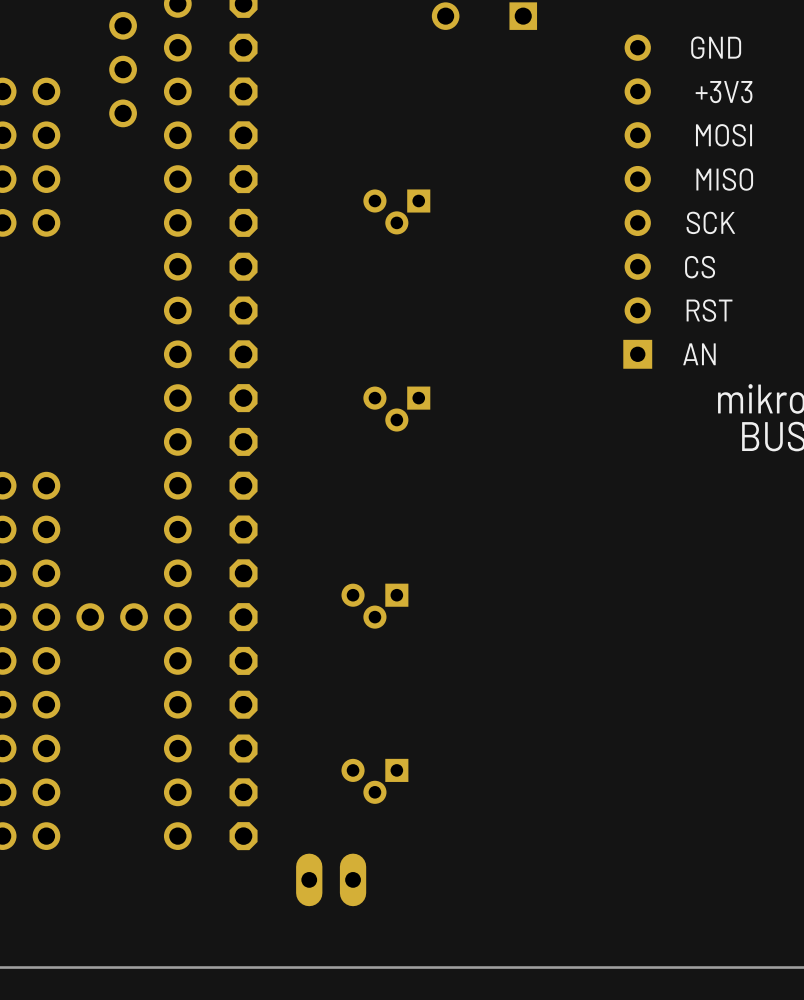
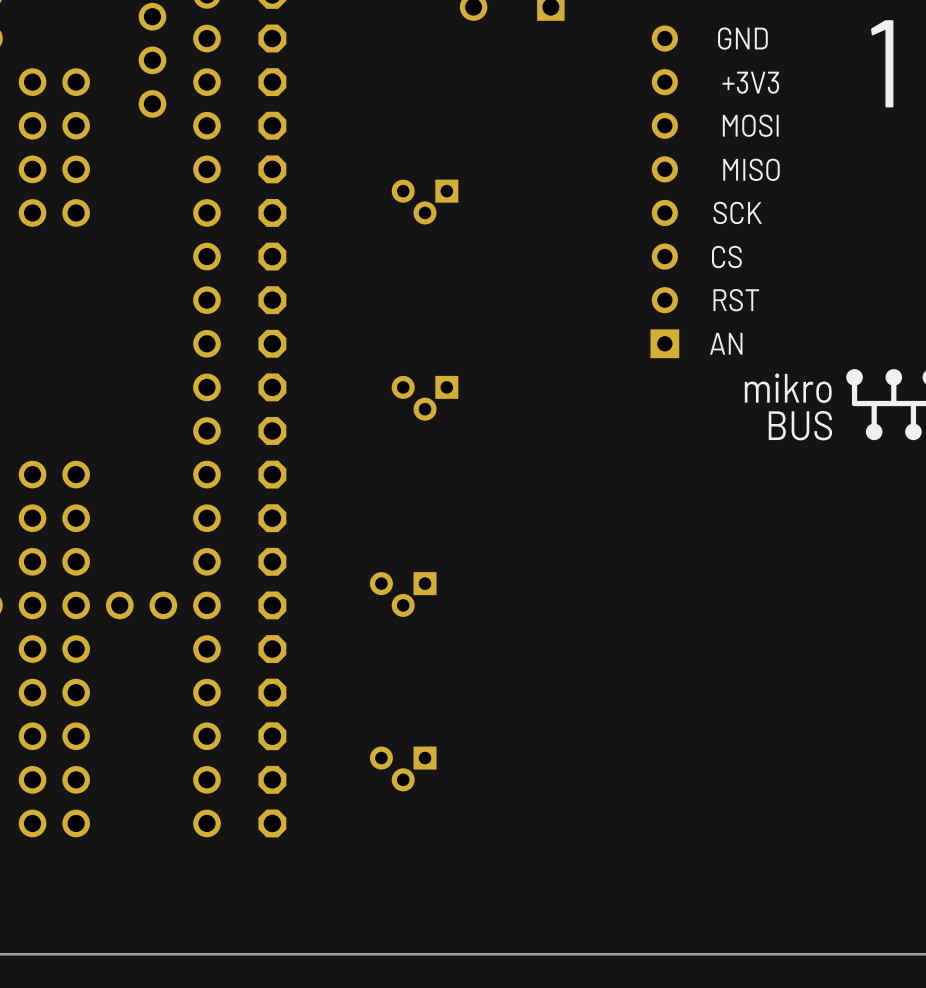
part: (331, 879) -> none

